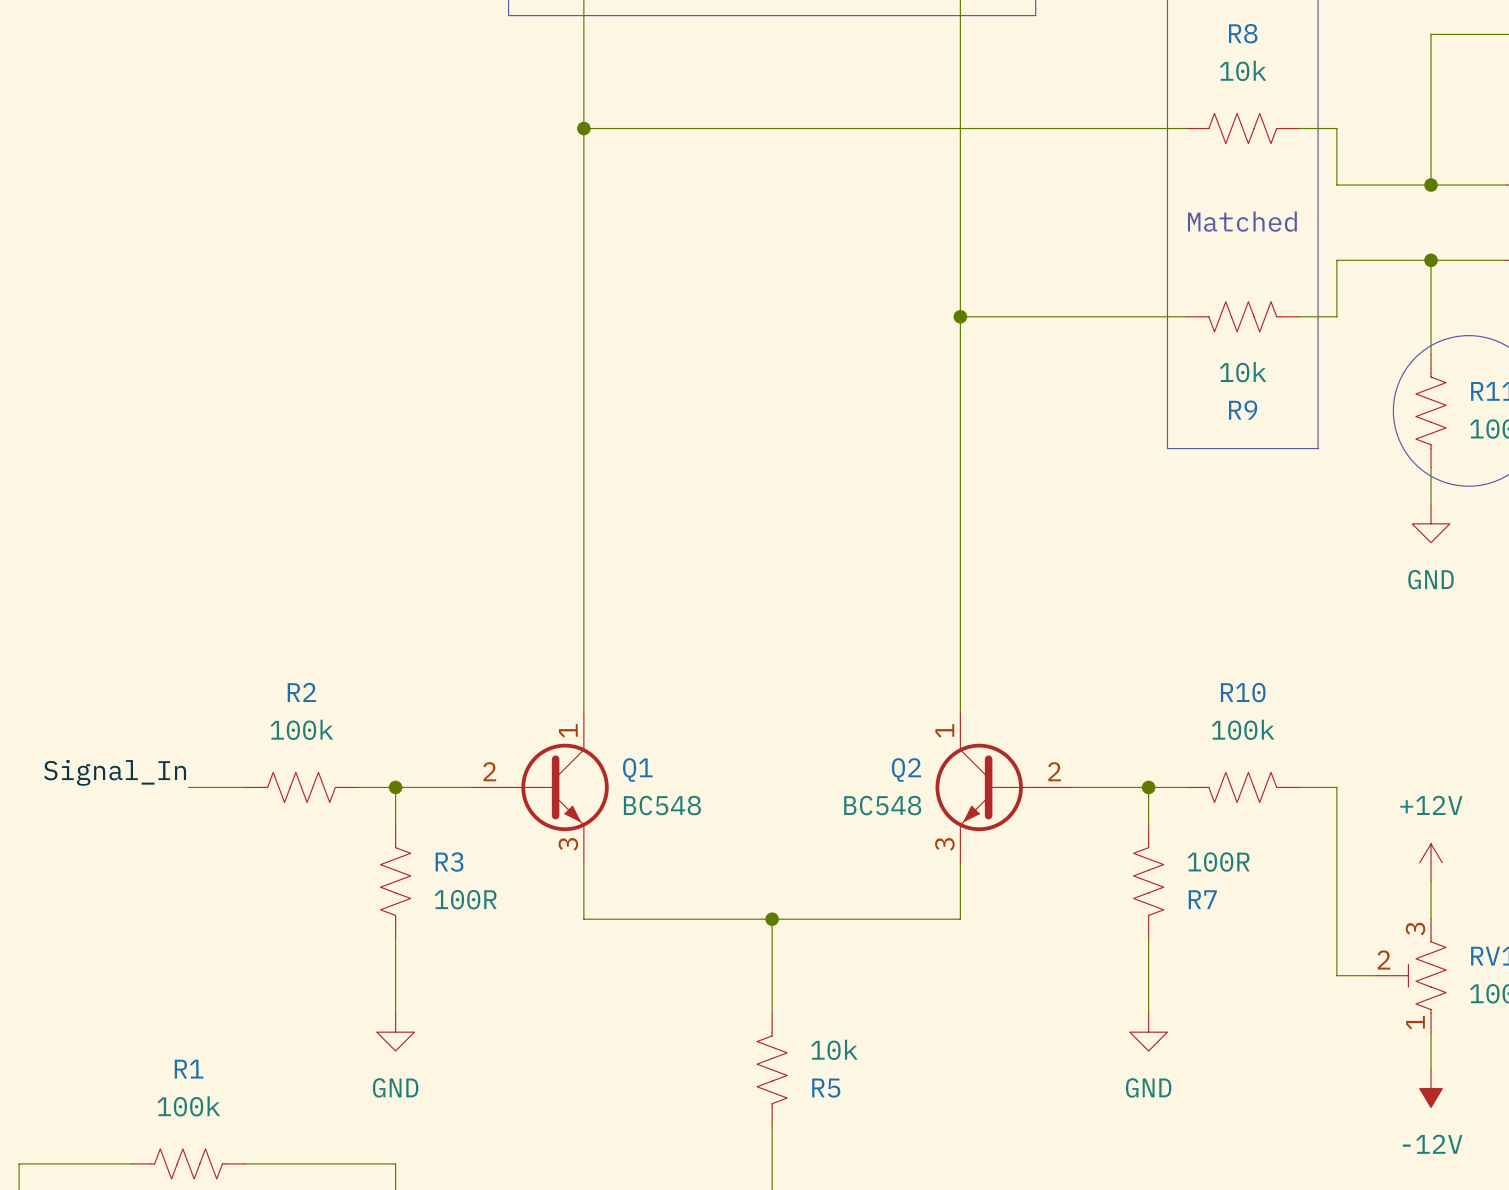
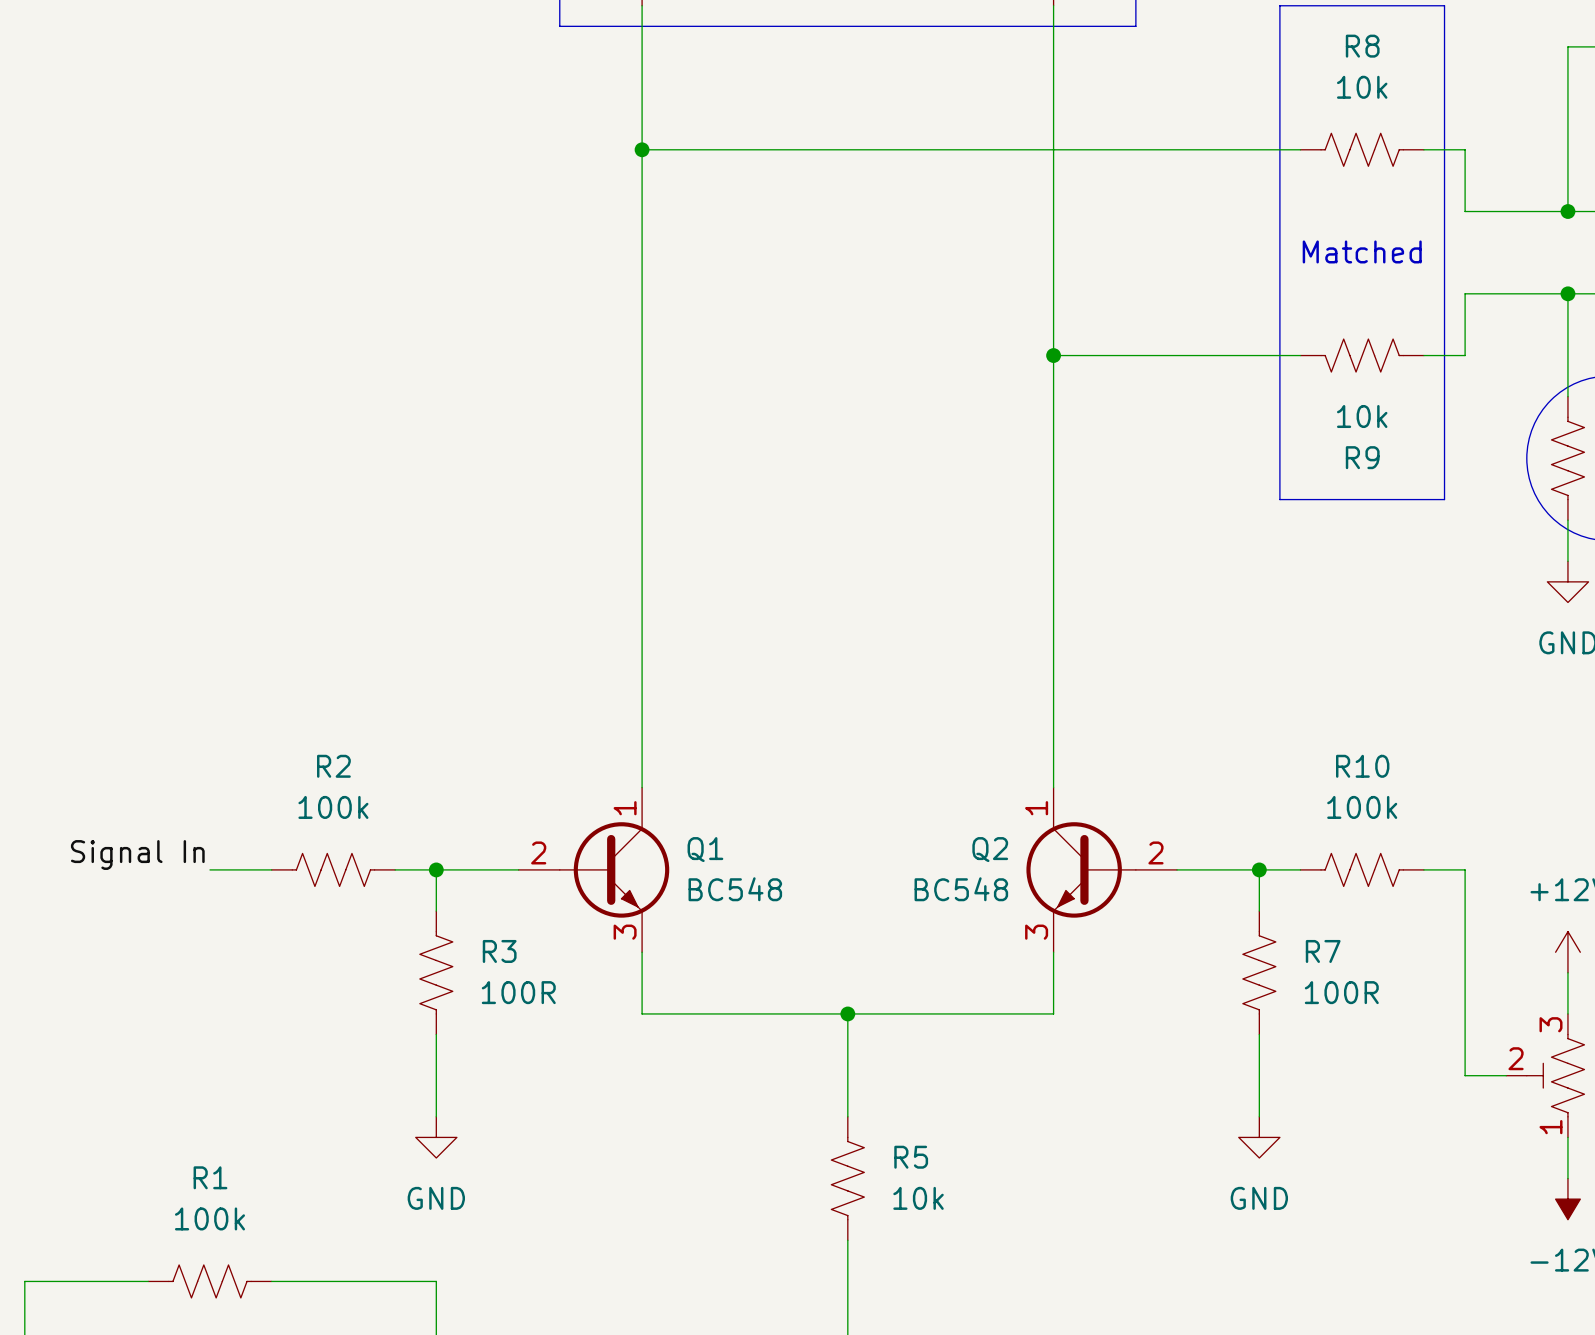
label: Signal_In (115, 772) -> Signal In (137, 855)
R10 flip: as is (1242, 787) -> left-right (1362, 869)
R7 value position: 100R (1218, 862) -> 100R (1341, 992)
R7 flip: as is (1148, 881) -> left-right (1259, 972)
R7 name position: R7 (1202, 899) -> R7 (1323, 951)
R5 value position: 10k (834, 1049) -> 10k (918, 1198)
R5 flip: as is (772, 1069) -> left-right (847, 1178)
R5 name position: R5 (826, 1088) -> R5 (911, 1157)

